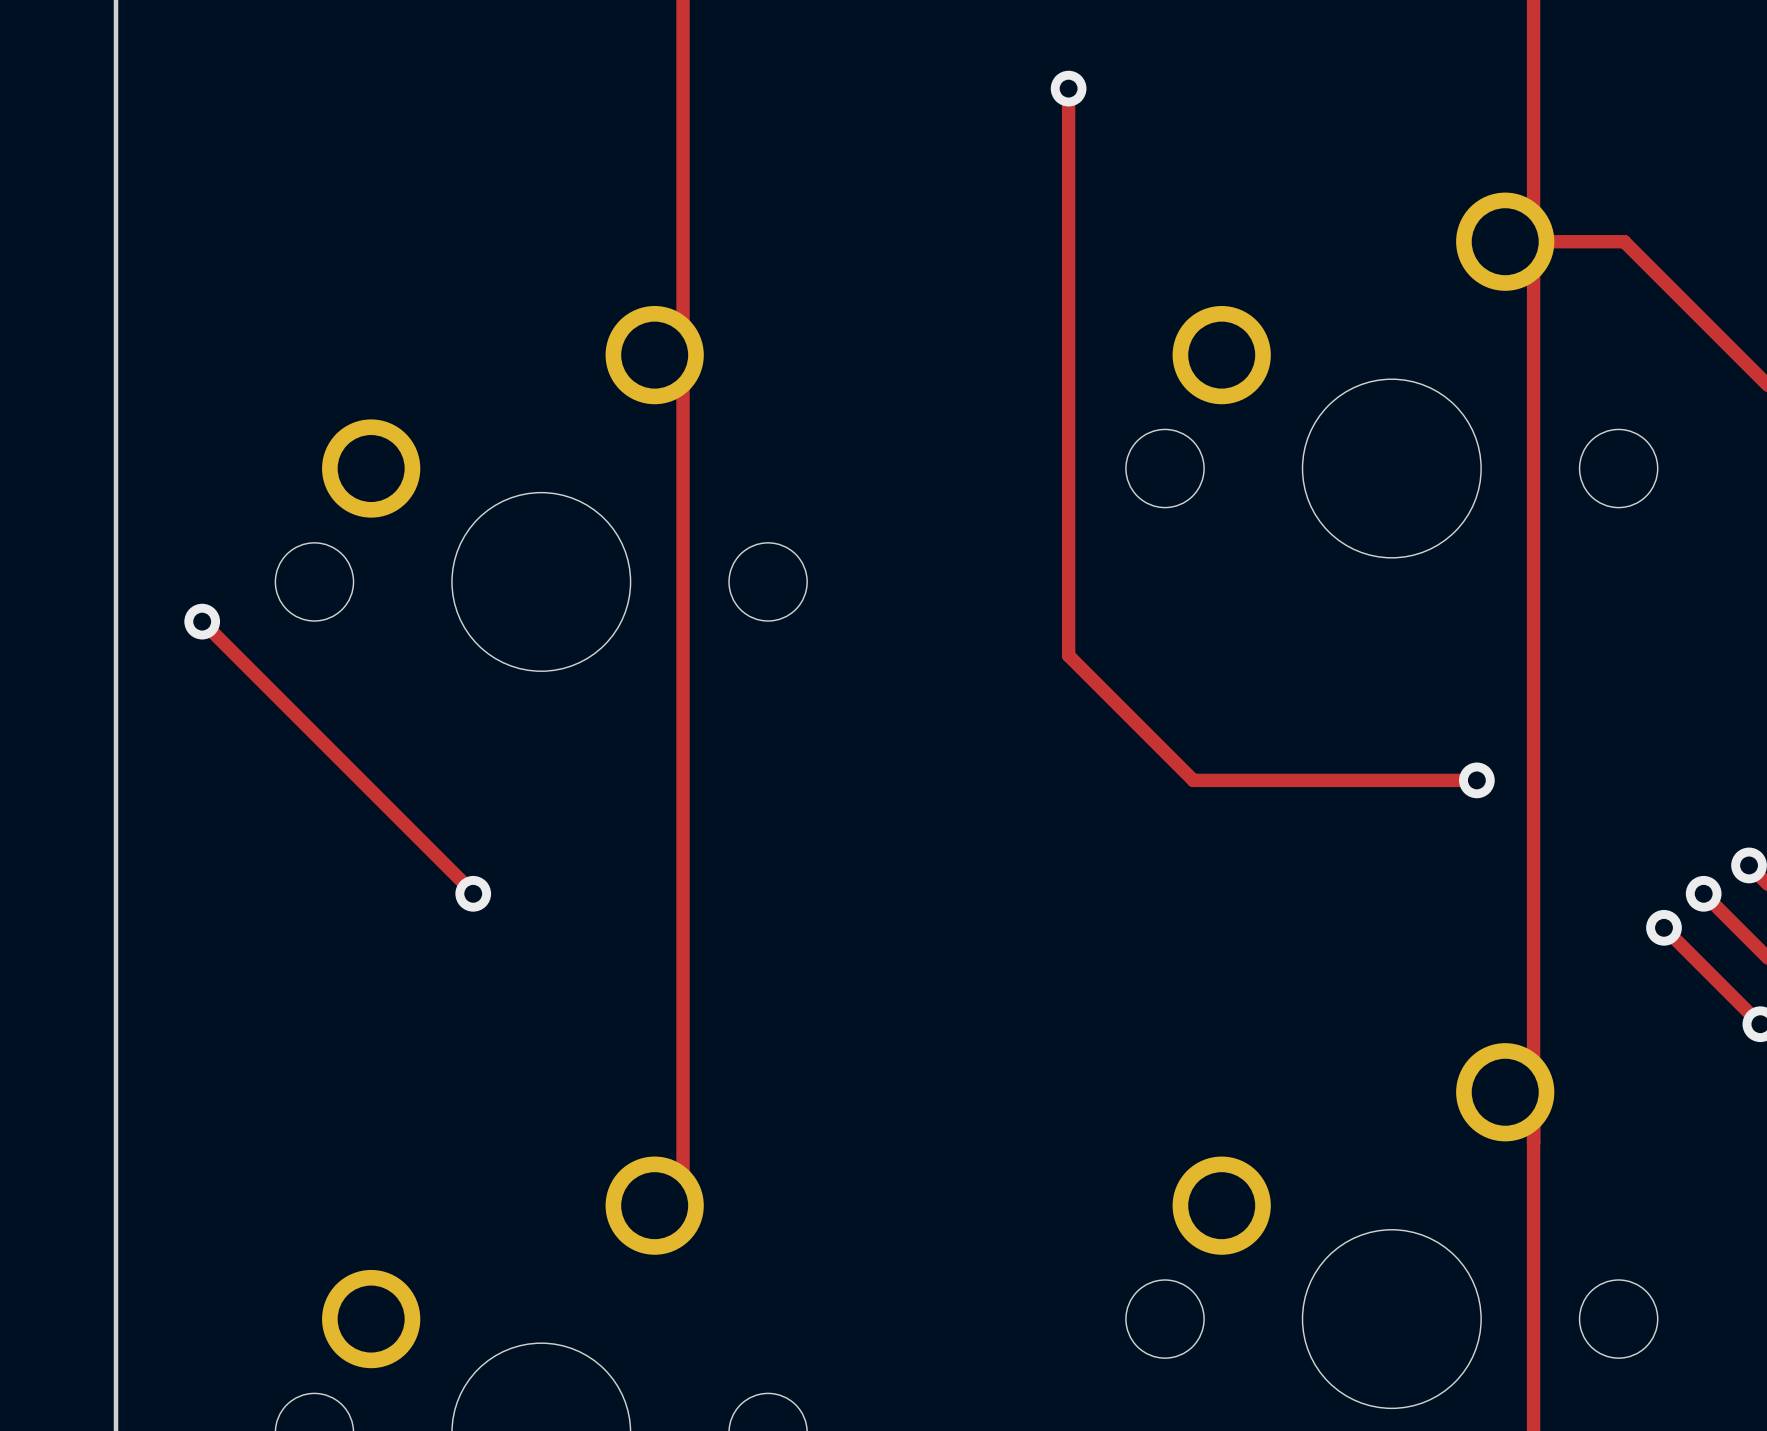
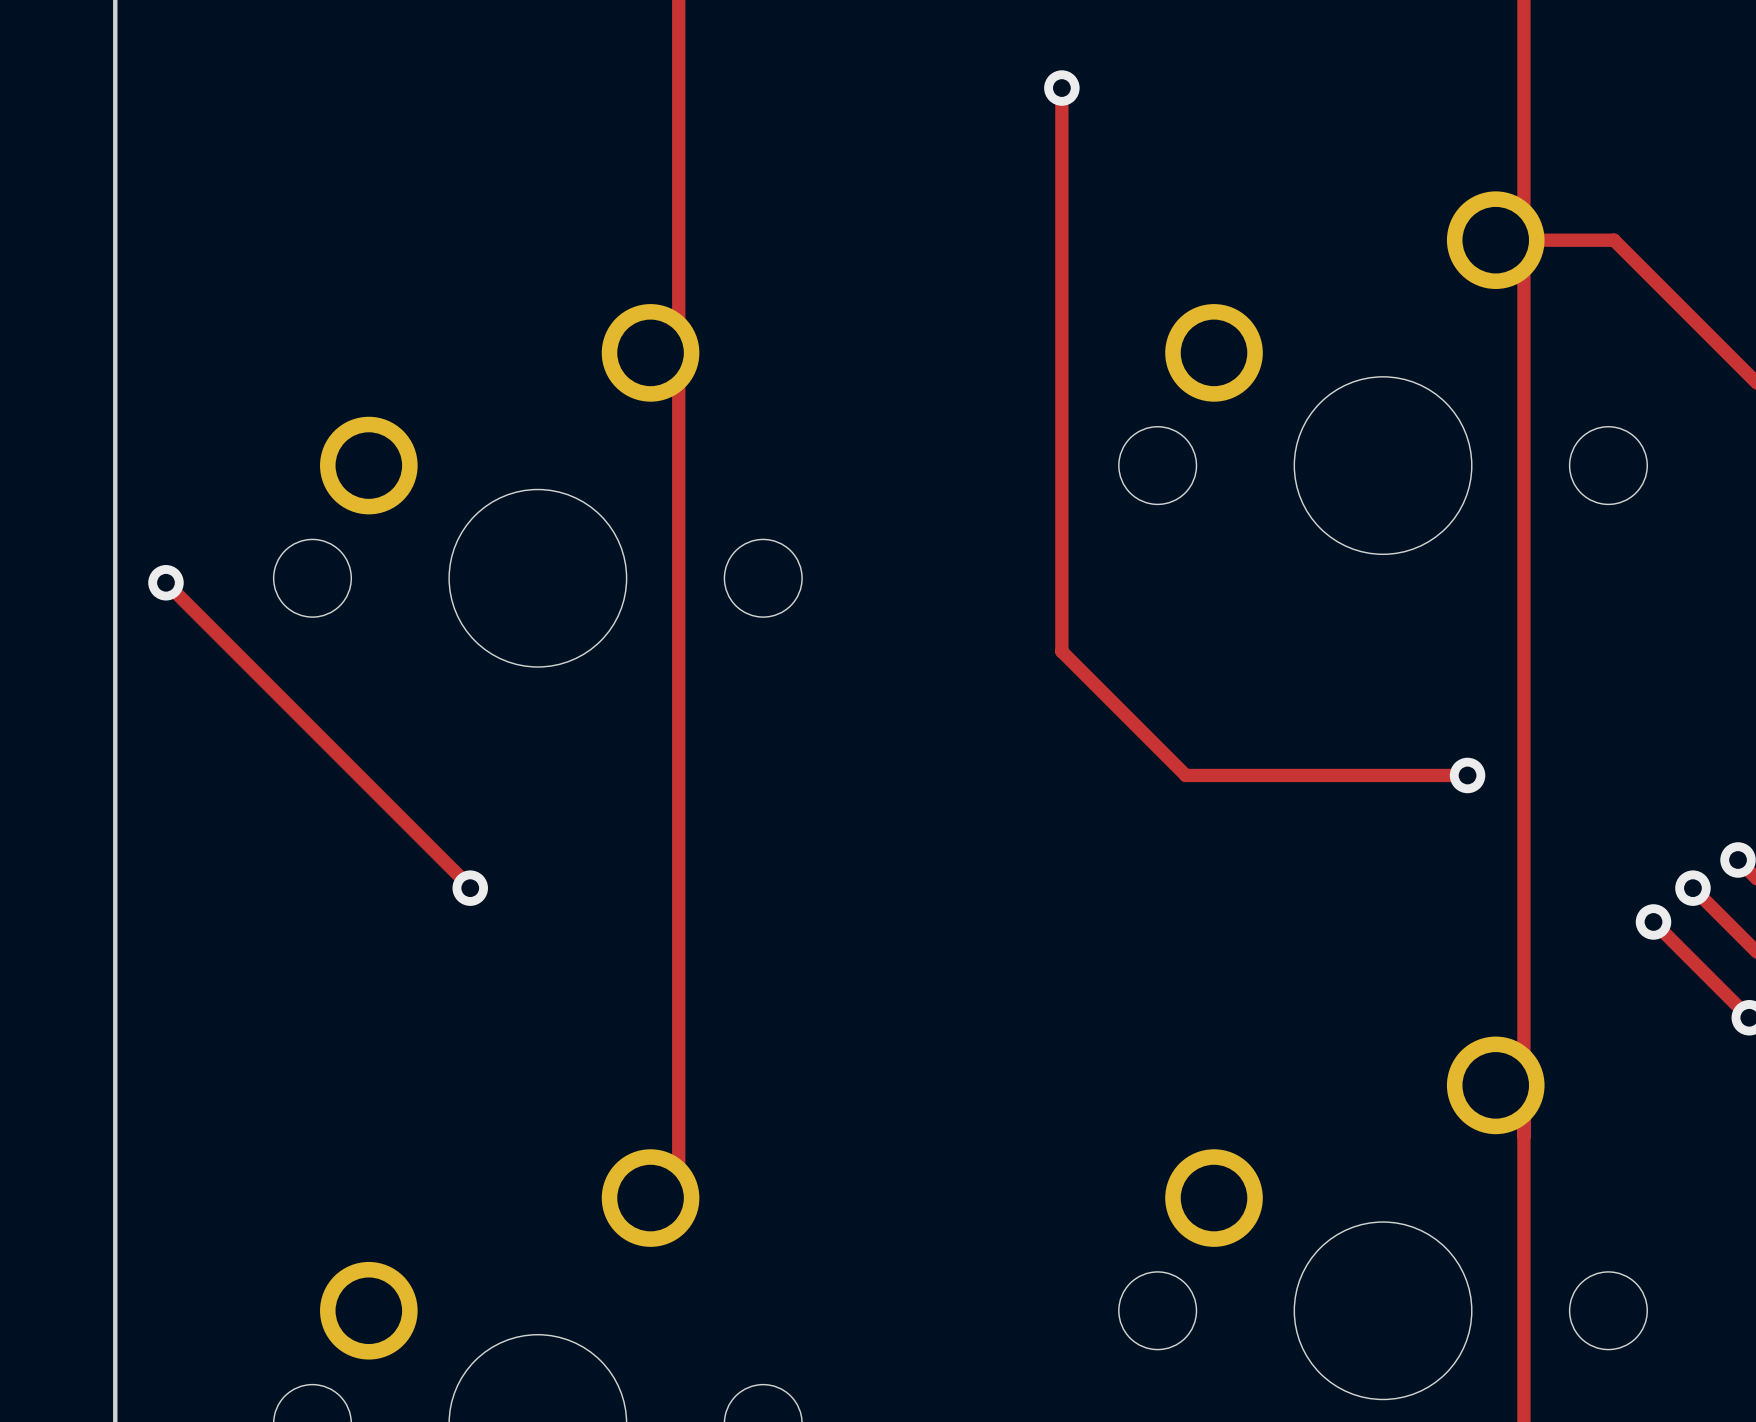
track: none -> (165, 582) (200, 617)
via position: (202, 621) -> (165, 582)

